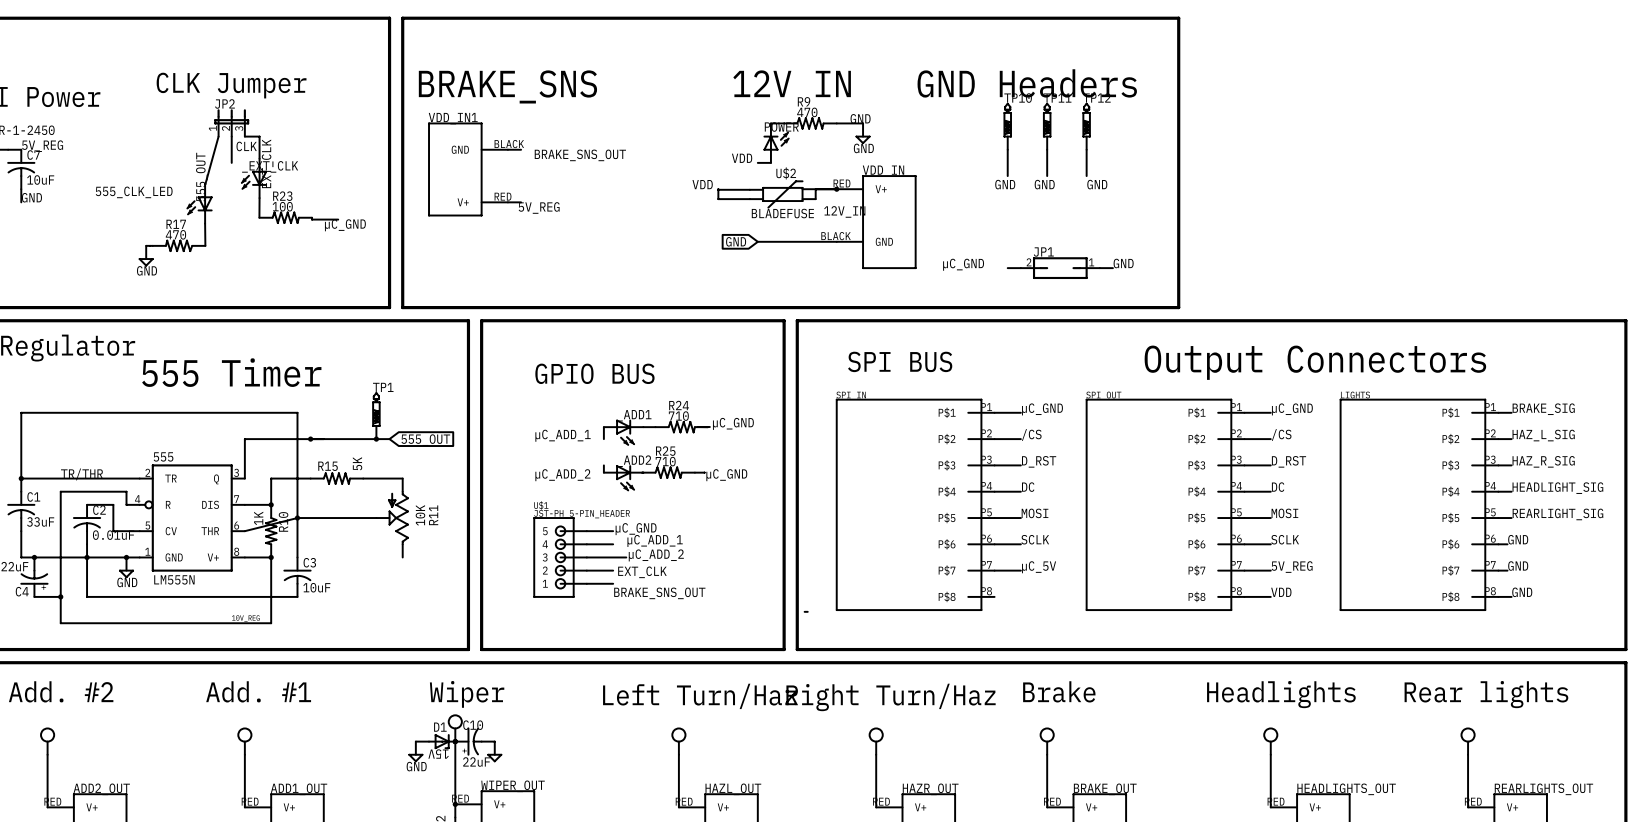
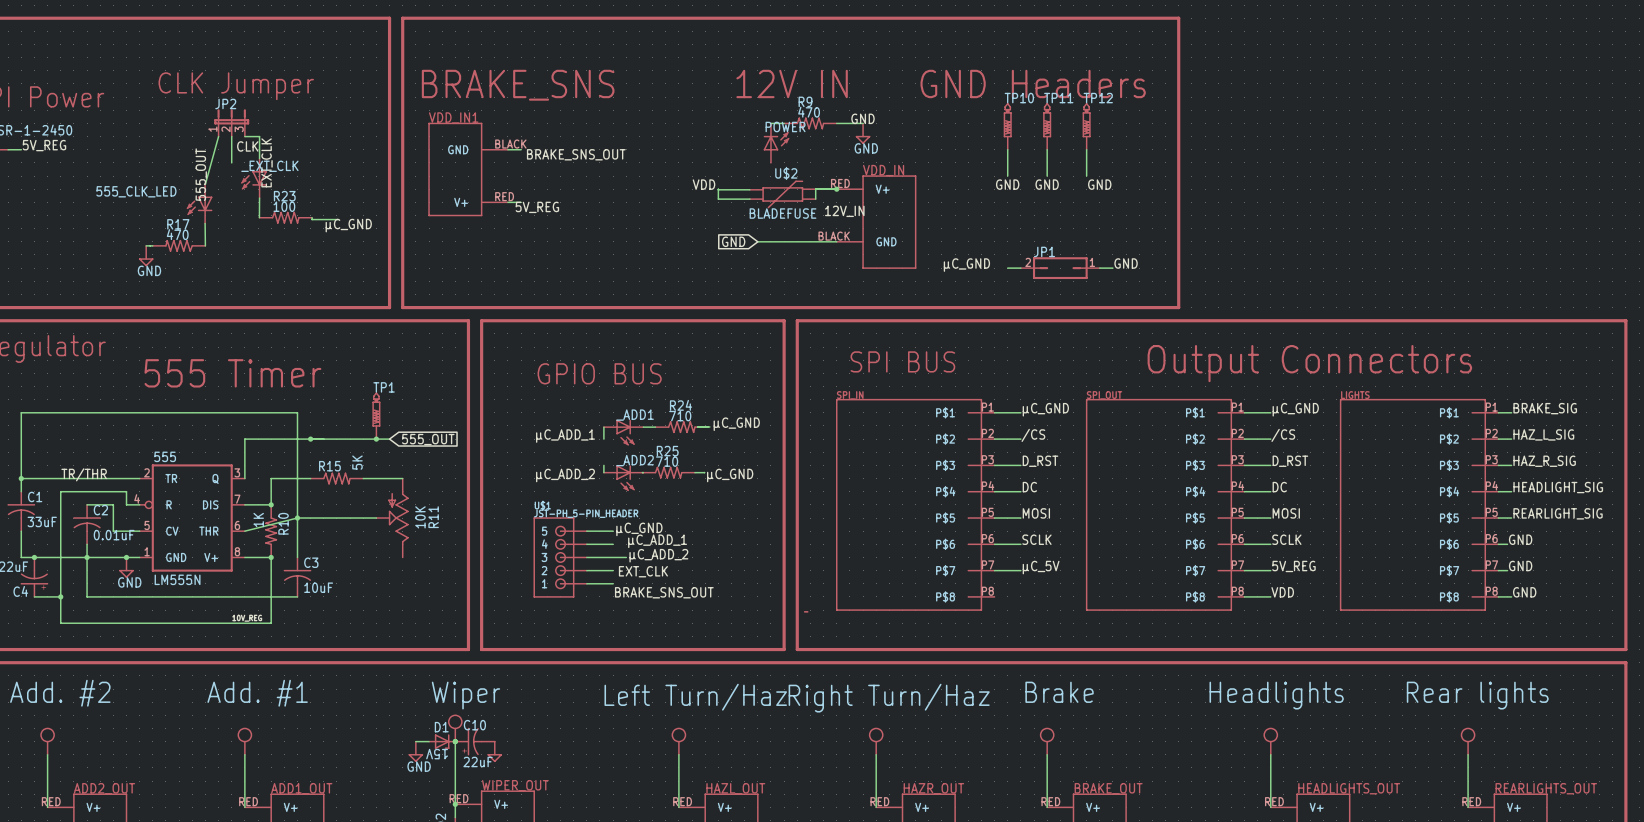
label: VDD (742, 158) -> none
wire: (757, 162) (770, 162) -> none
C7: 10uF (21, 169) -> none
wire: (21, 189) (21, 202) -> none
label: GND (31, 197) -> none

